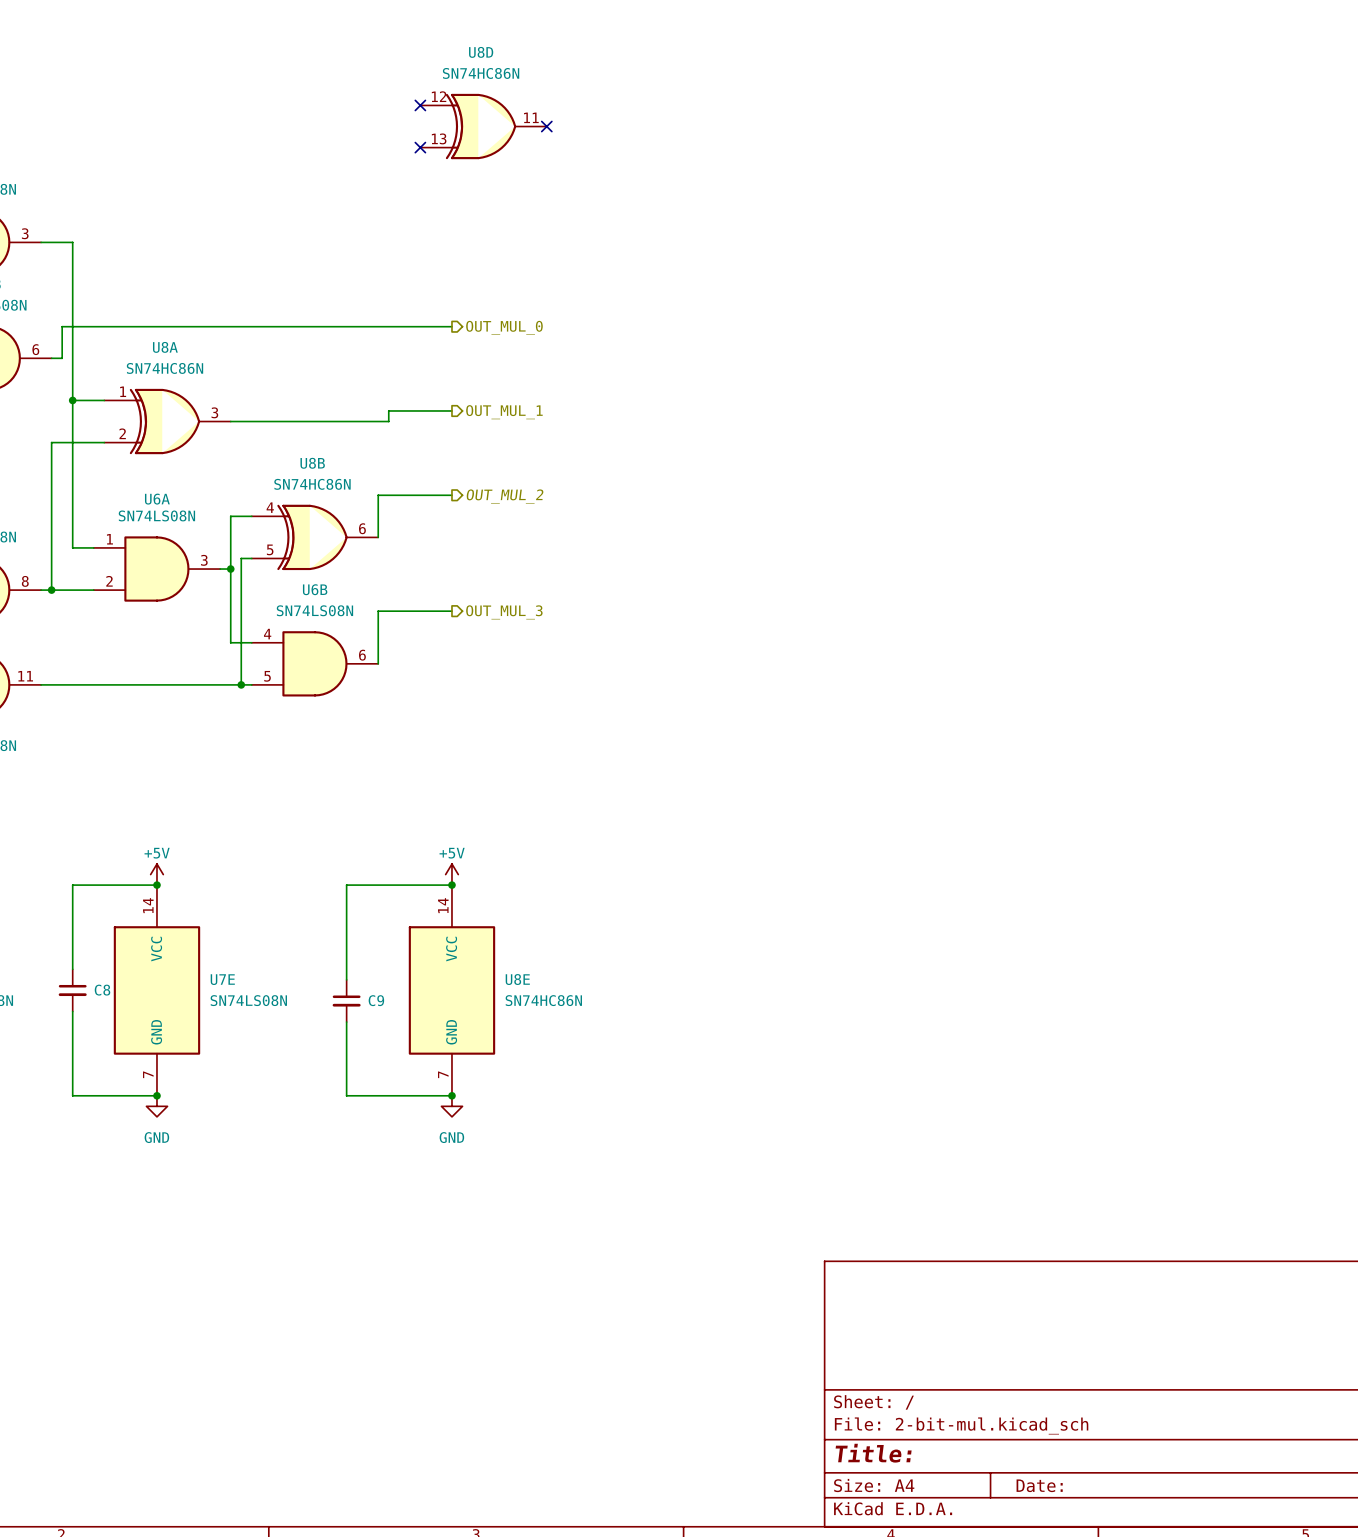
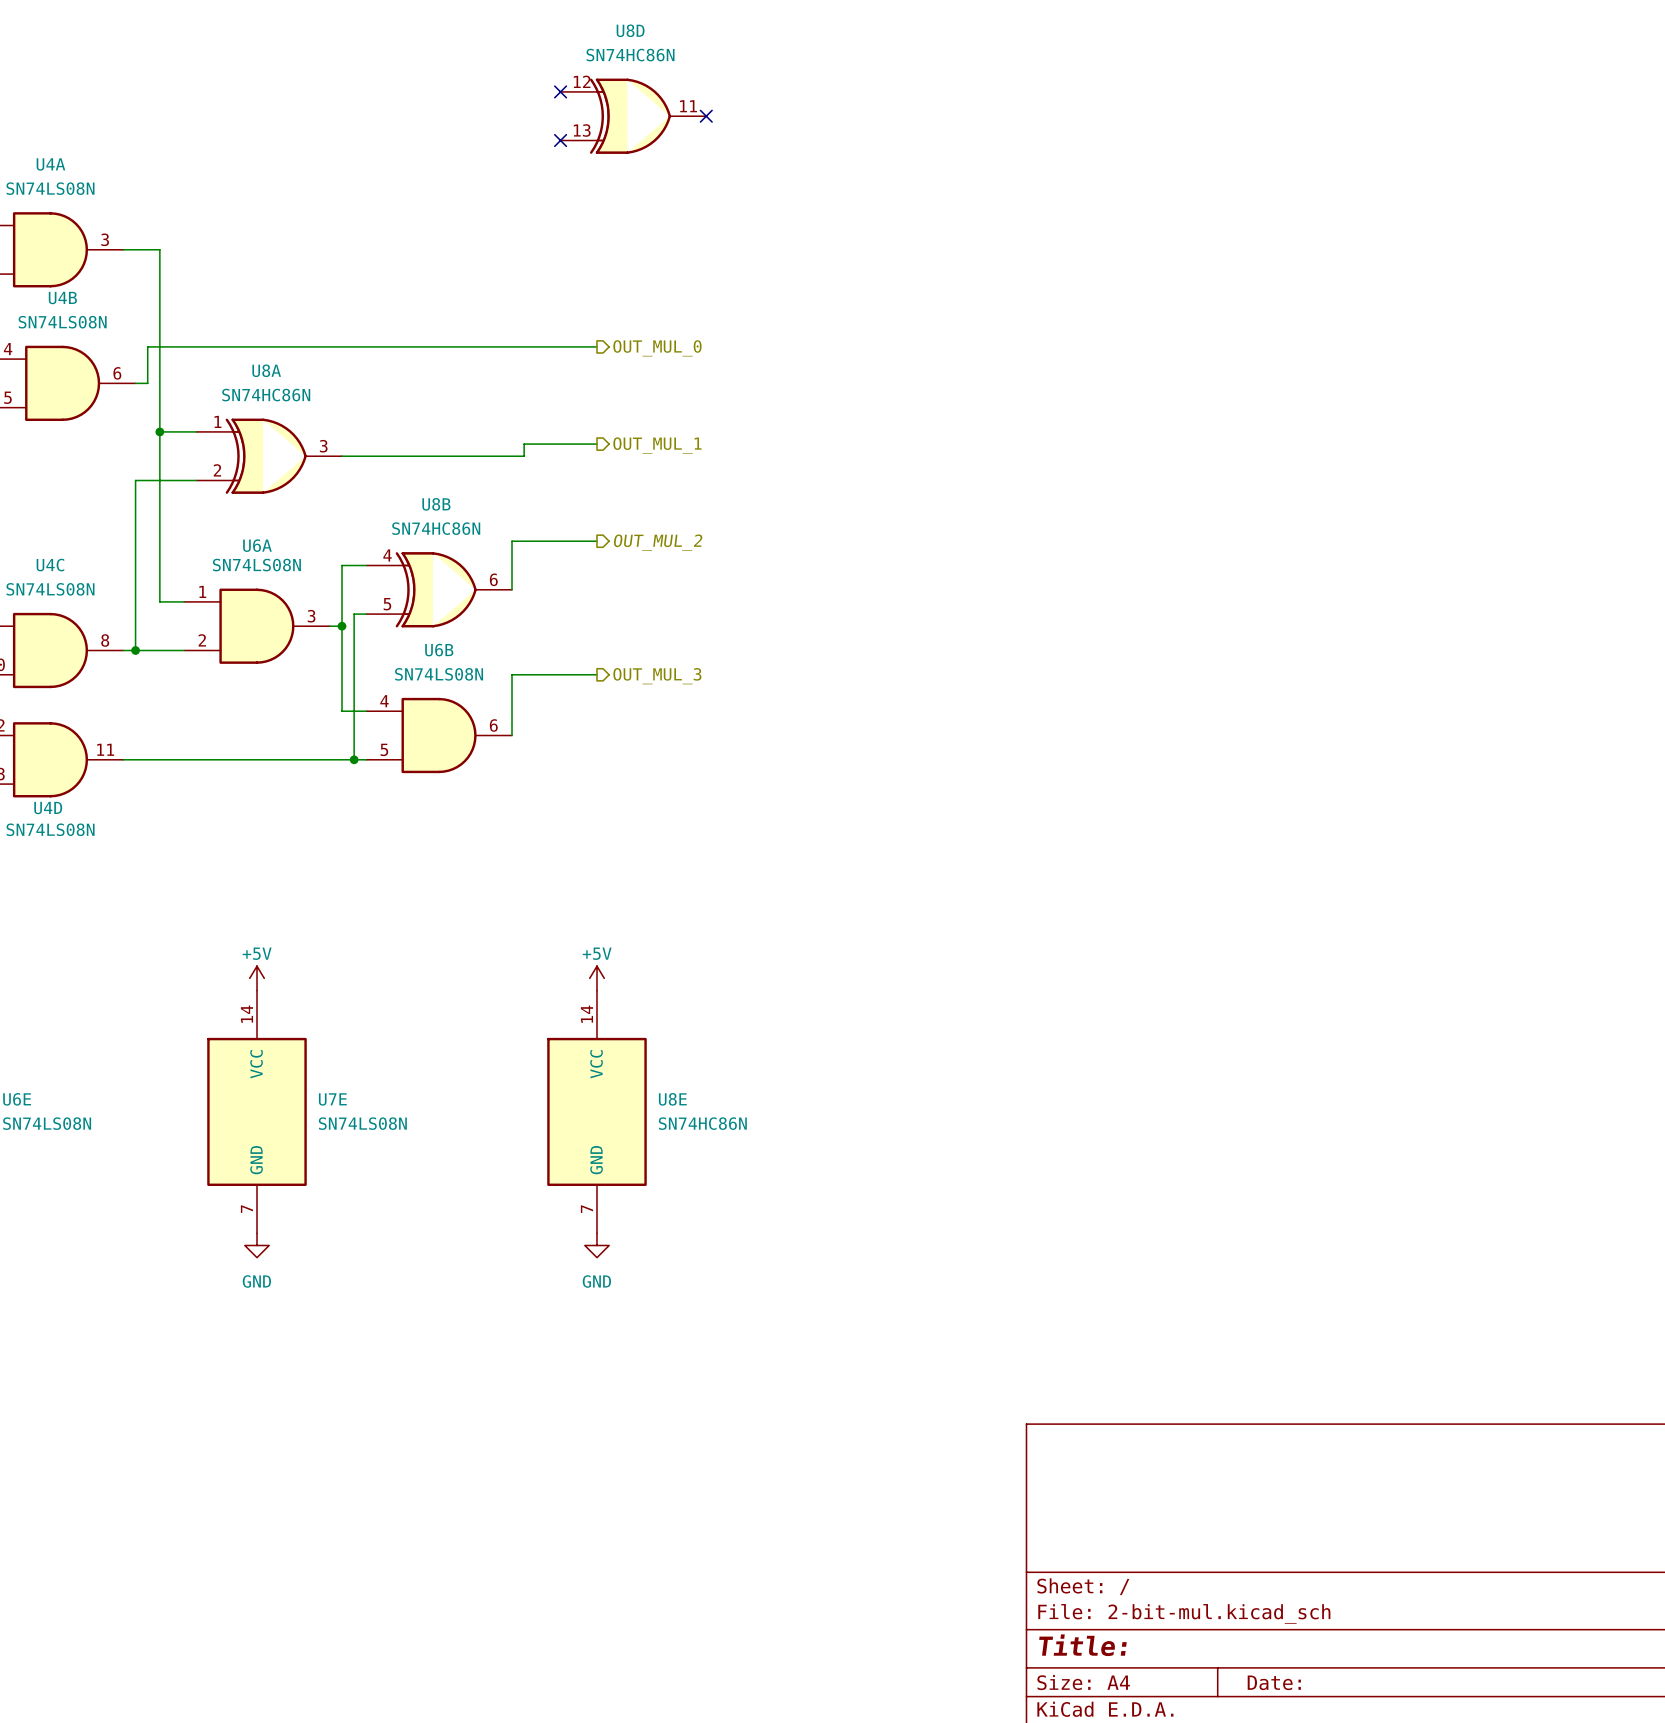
wire: (156, 885) (72, 885) (72, 969) -> none
junction: (156, 885) -> none
wire: (451, 885) (346, 885) (346, 979) -> none
junction: (451, 885) -> none
C8: (72, 990) -> none
C9: (346, 1000) -> none
wire: (72, 1011) (72, 1095) (156, 1095) -> none
wire: (346, 1022) (346, 1095) (451, 1095) -> none
junction: (156, 1095) -> none
junction: (451, 1095) -> none

